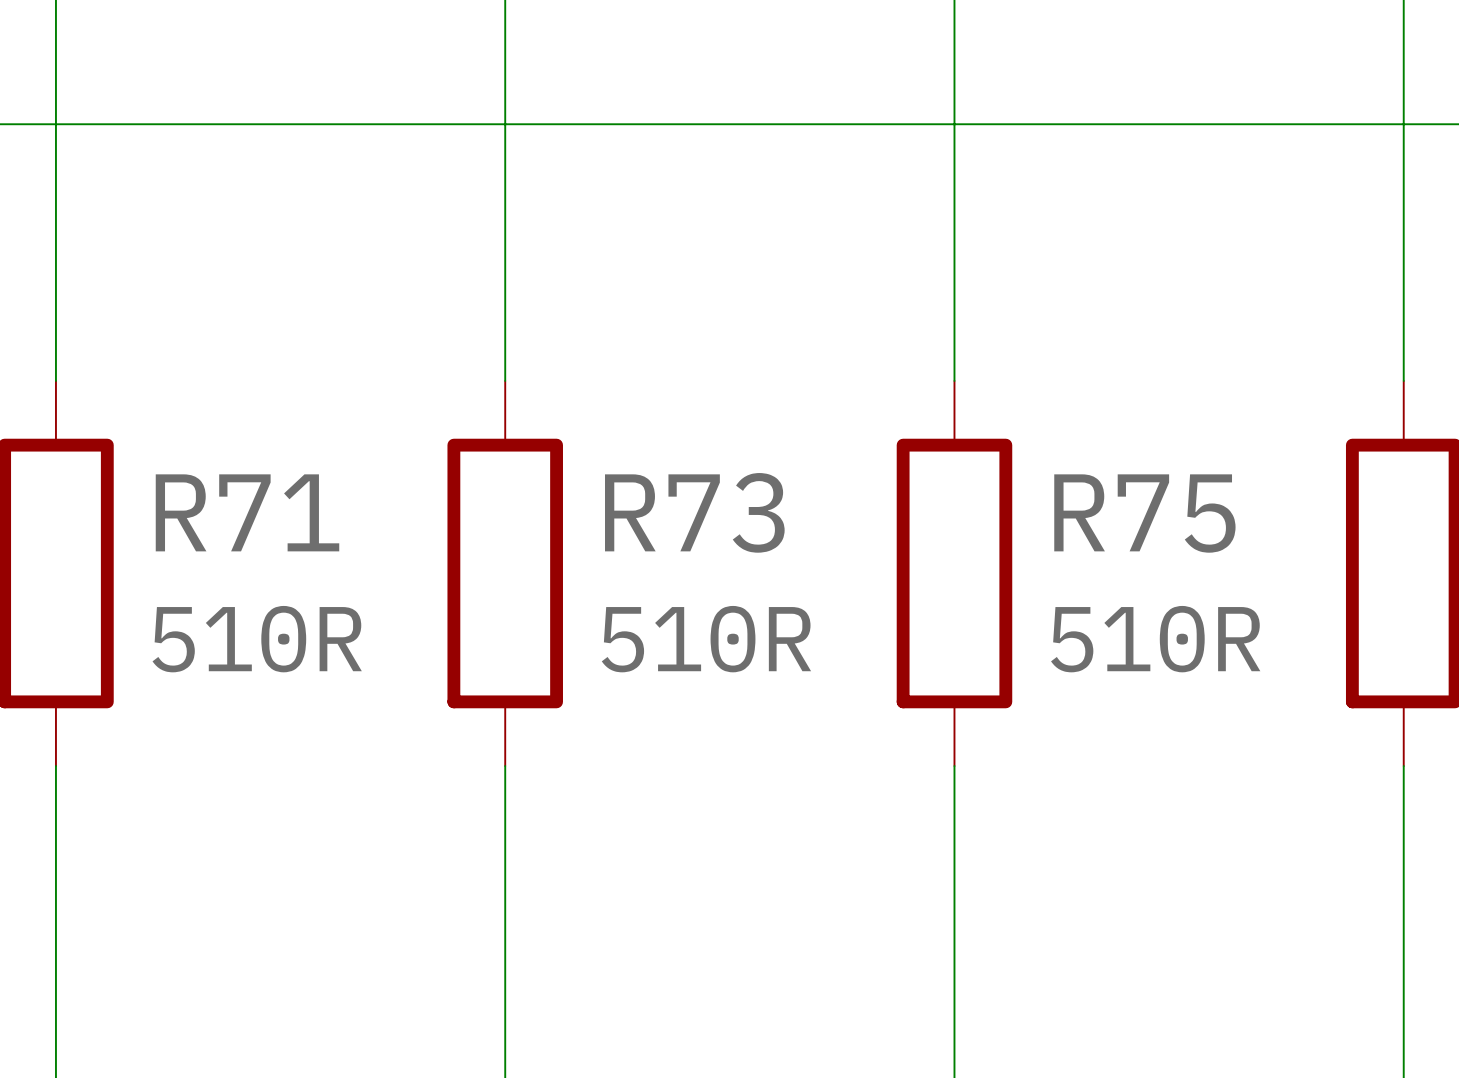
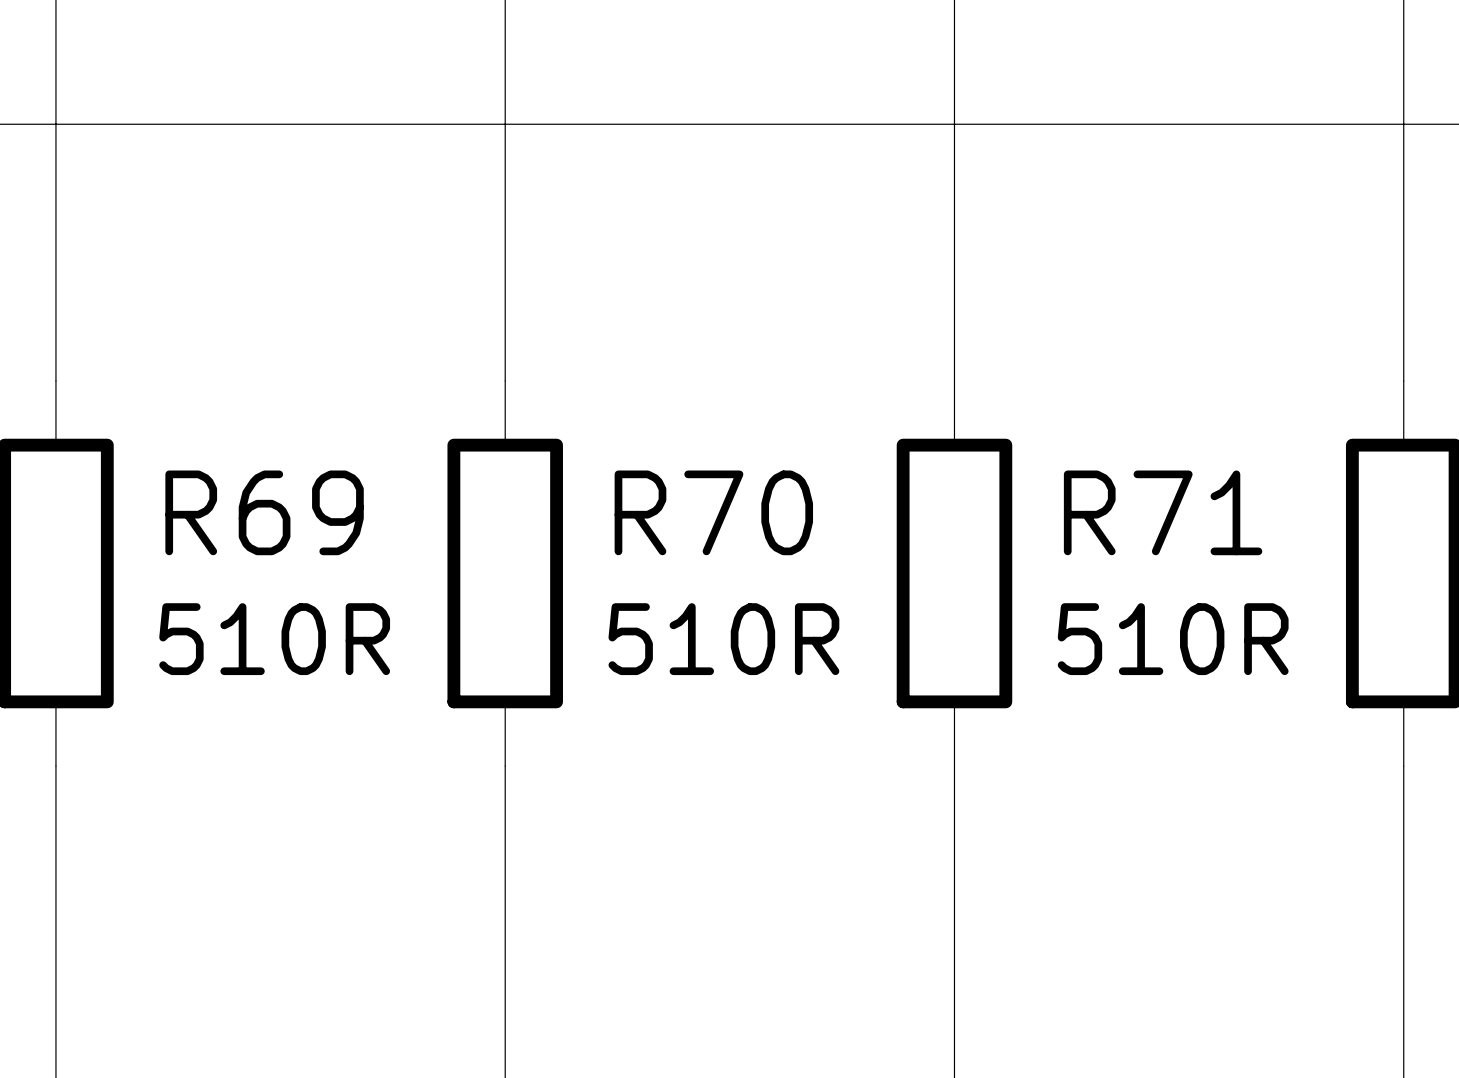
R71 name: R71 (247, 512) -> R69 (264, 512)
R73 name: R73 (694, 512) -> R70 (713, 512)
R75 name: R75 (1144, 513) -> R71 (1163, 512)

